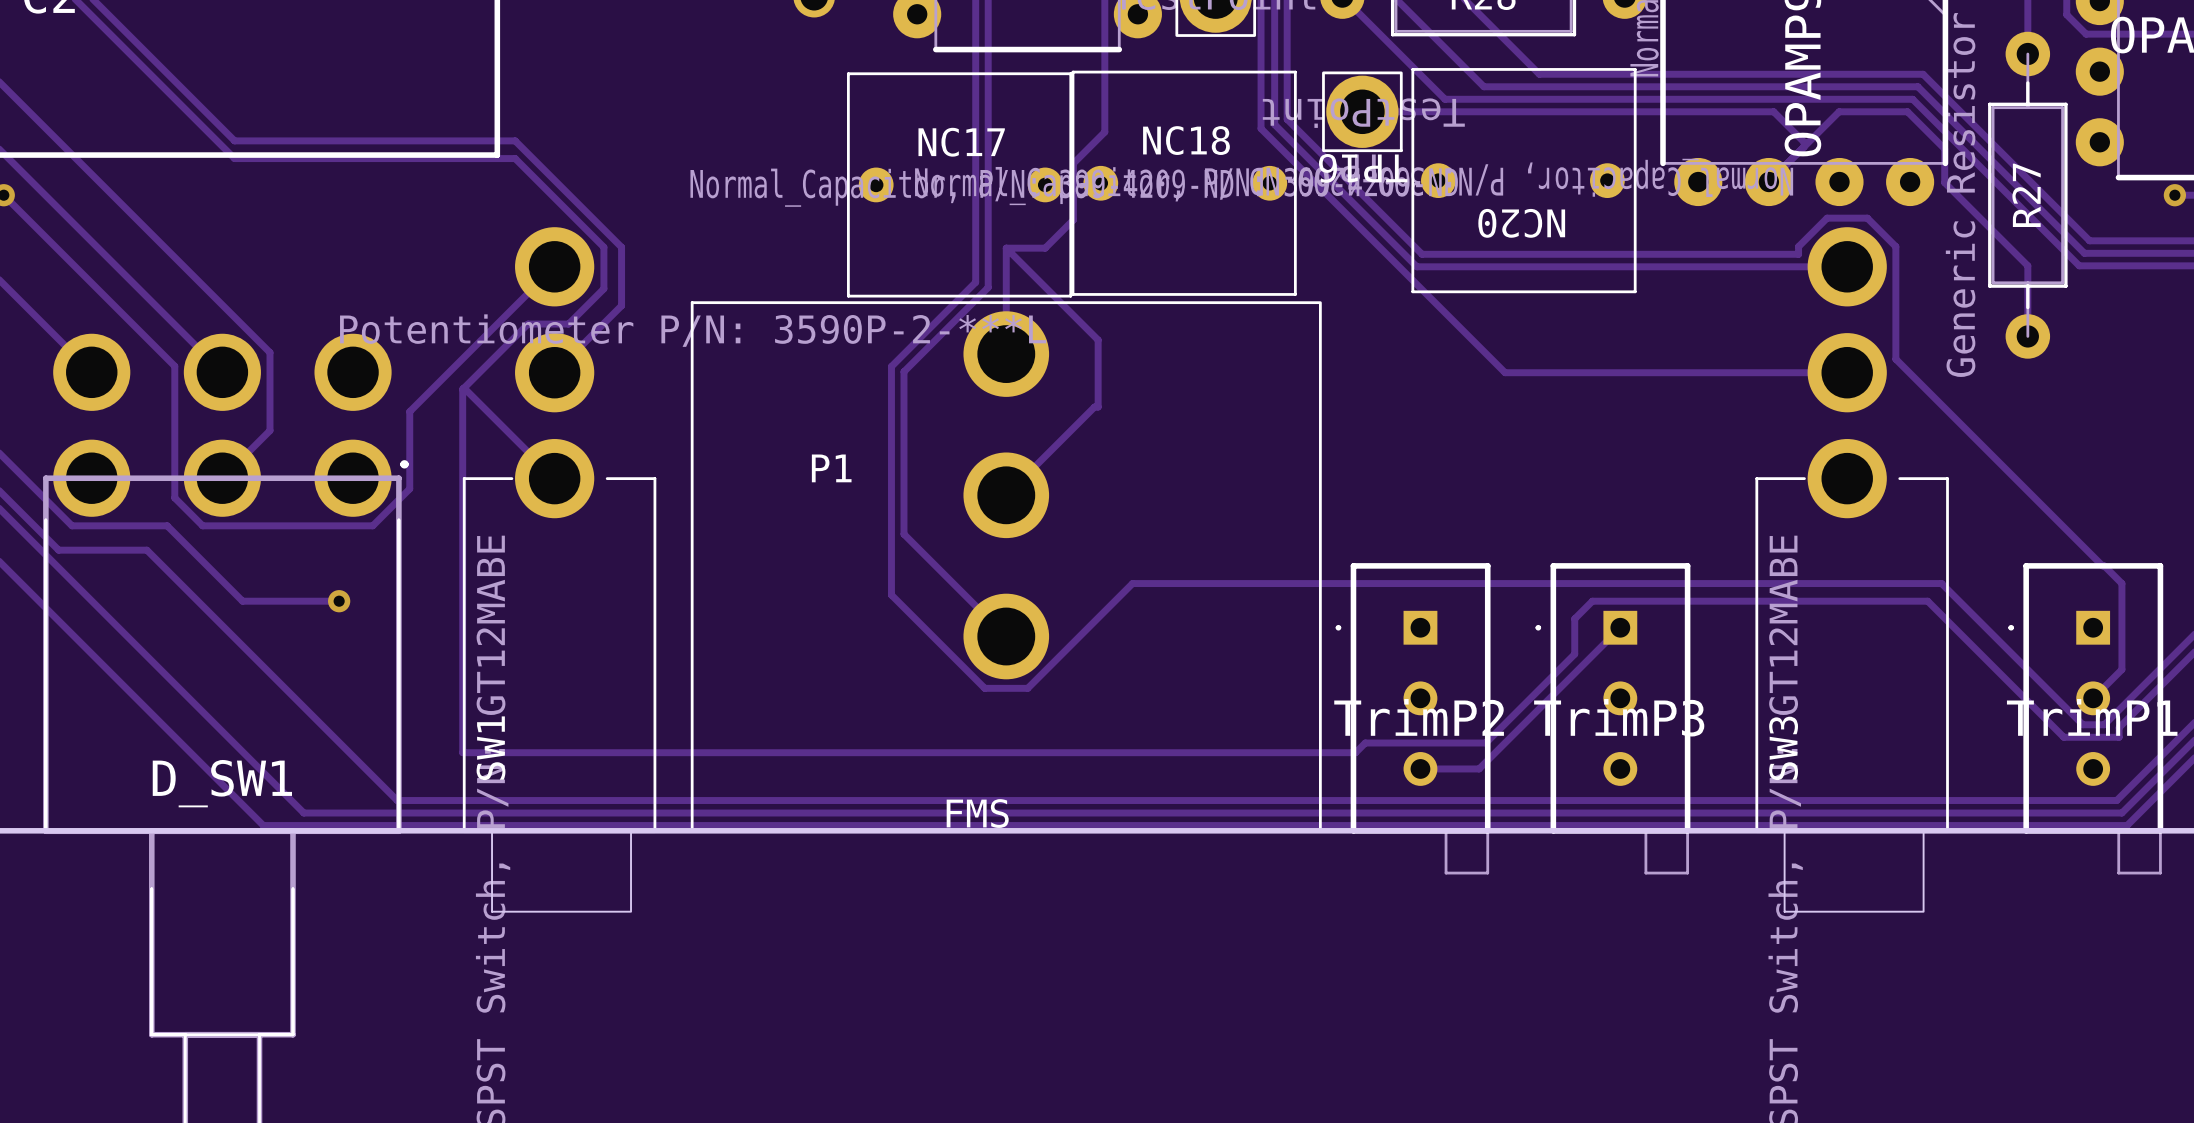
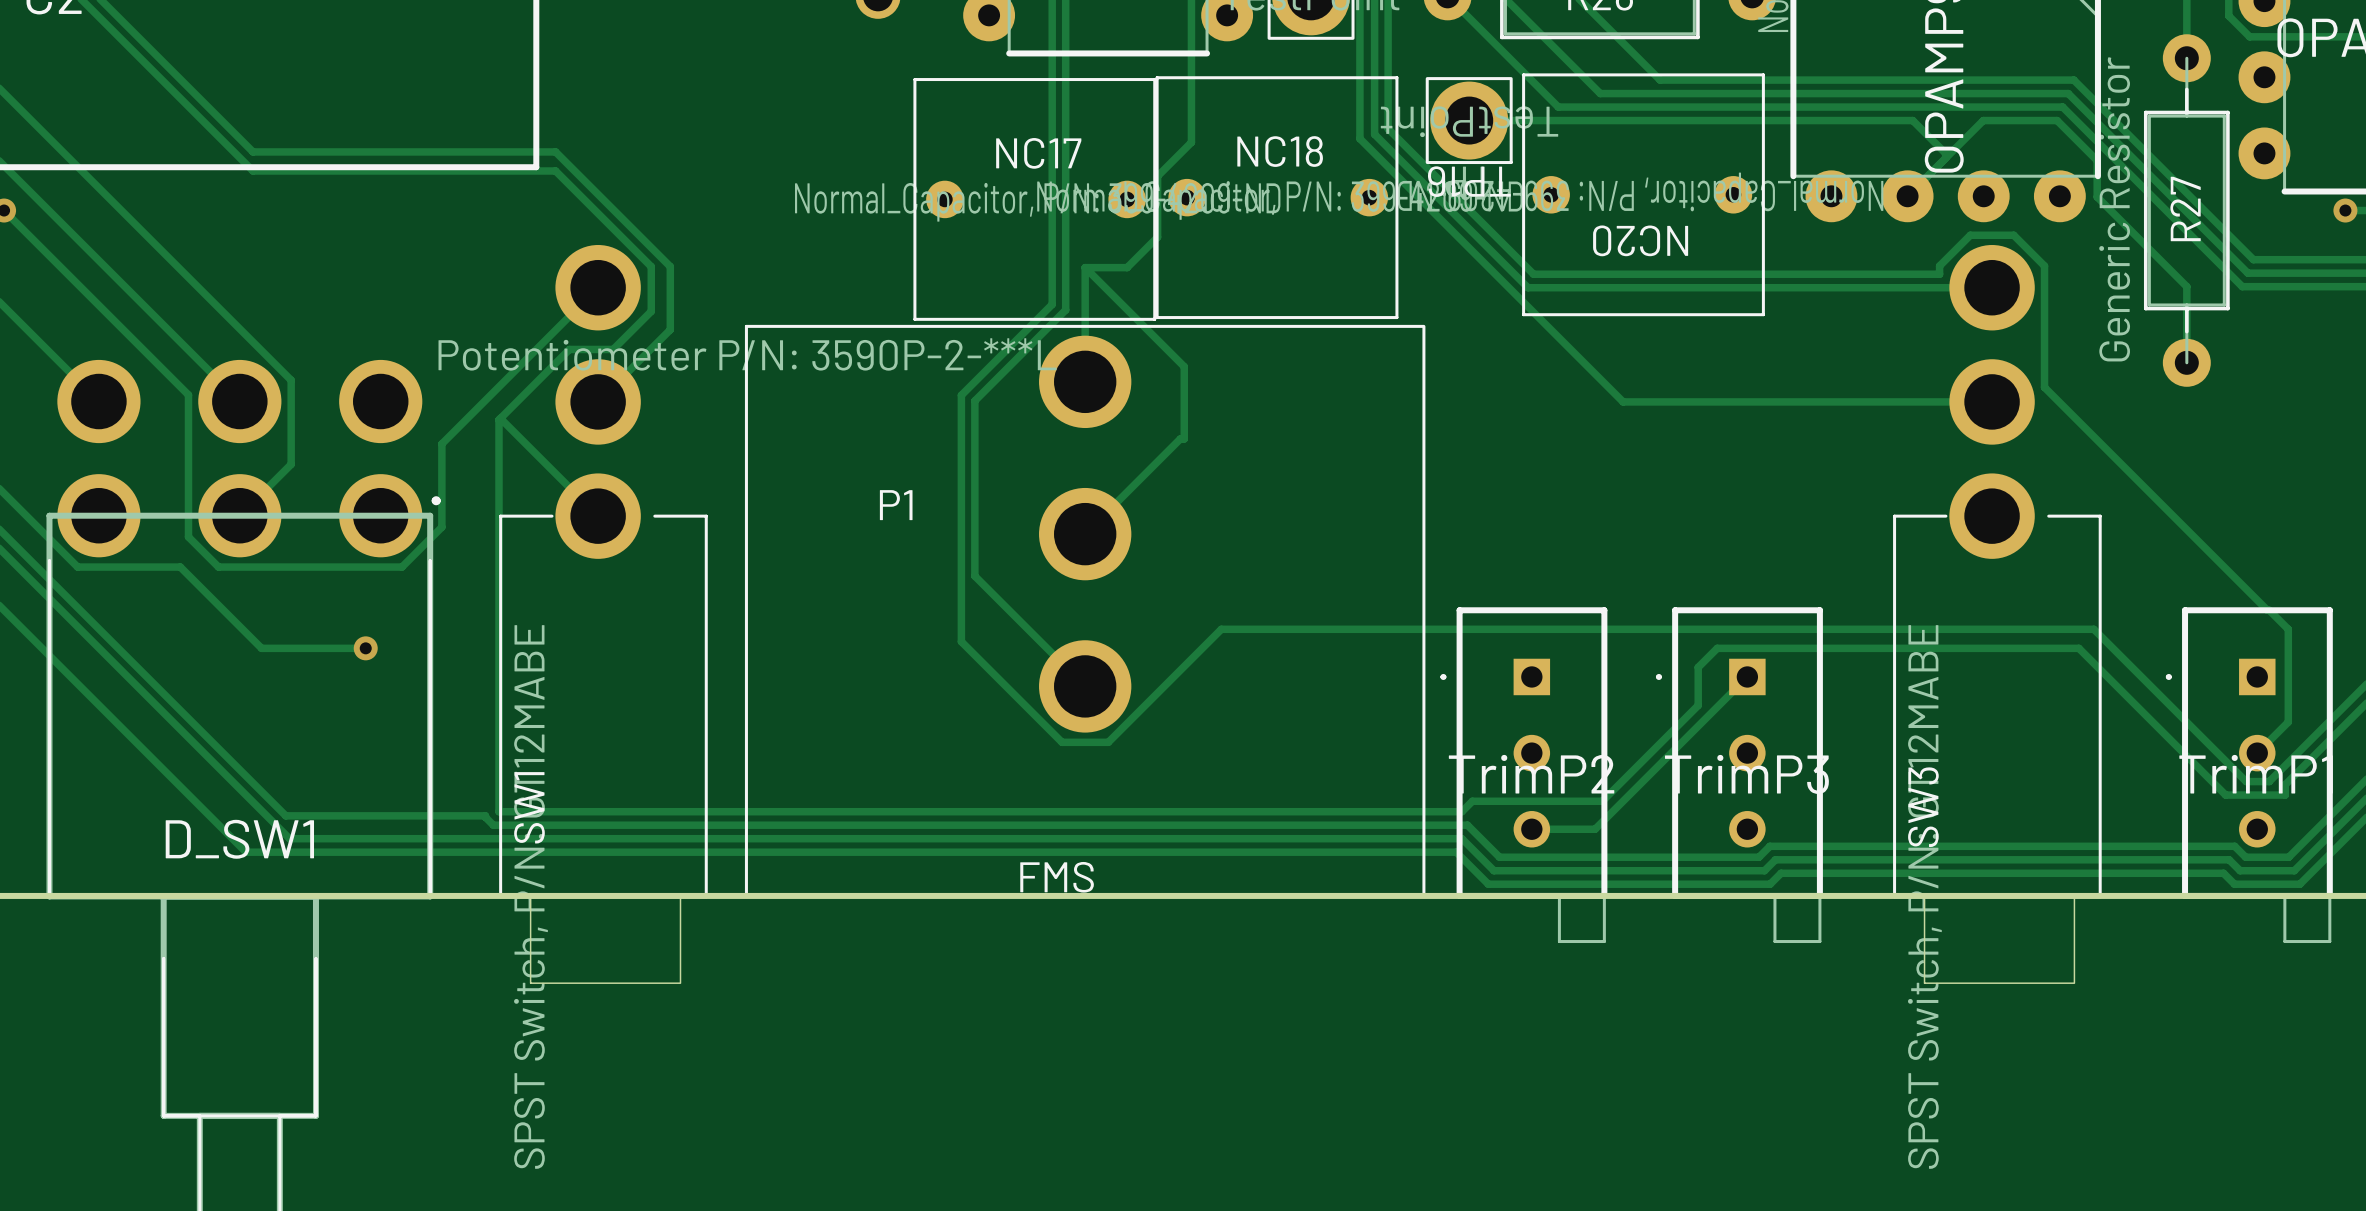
track: (58, 550) (146, 550) (397, 800) (2116, 800) (2122, 794) -> (63, 593) (285, 815) (485, 815) (493, 825) (1467, 825) (1499, 857) (1758, 857) (1769, 846) (2234, 846) (2245, 857) (2288, 857)
track: (268, 777) (303, 813) (2121, 813) (2127, 807) -> (289, 838) (1461, 838) (1493, 870) (1764, 870) (1775, 859) (2229, 859) (2240, 870) (2294, 870)
track: (228, 790) (263, 825) (2127, 825) (2132, 819) -> (245, 852) (1456, 852) (1488, 884) (1770, 884) (1781, 873) (2223, 873) (2234, 884) (2299, 884)

